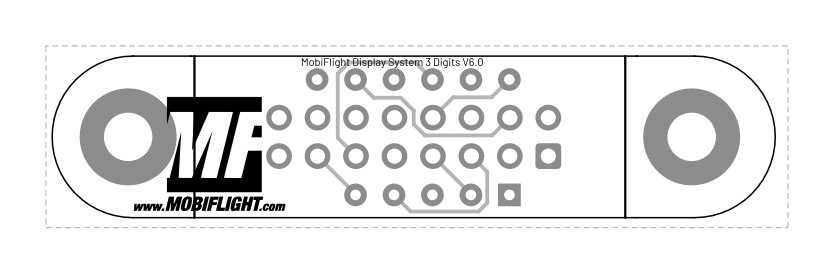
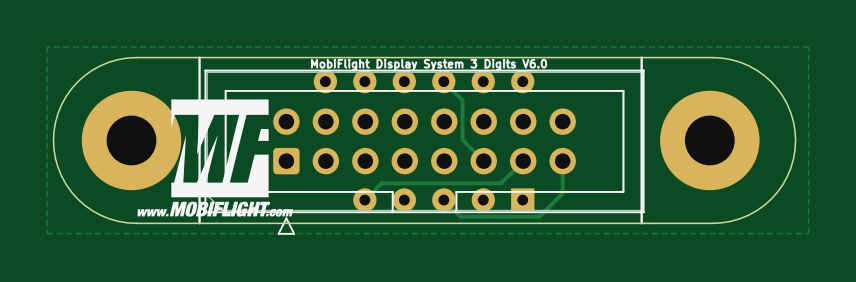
track: (355, 79) (373, 97) (400, 97) (413, 110) (413, 124) (424, 135) (492, 135) (509, 117) -> none
track: (432, 79) (415, 62) (348, 62) (337, 73) (337, 137) (356, 156) -> (443, 81) (462, 100) (462, 139) (483, 161)
track: (509, 79) (491, 97) (453, 97) (432, 117) -> none
part side: top (413, 136) -> bottom (424, 152)
track: (317, 156) (355, 194) -> (523, 161) (501, 183) (381, 183) (364, 200)
track: (432, 156) (470, 194) -> none
track: (471, 156) (487, 171) (487, 202) (478, 211) (410, 211) (393, 194) -> none
track: none -> (562, 161) (562, 193) (539, 216) (460, 216) (443, 200)

